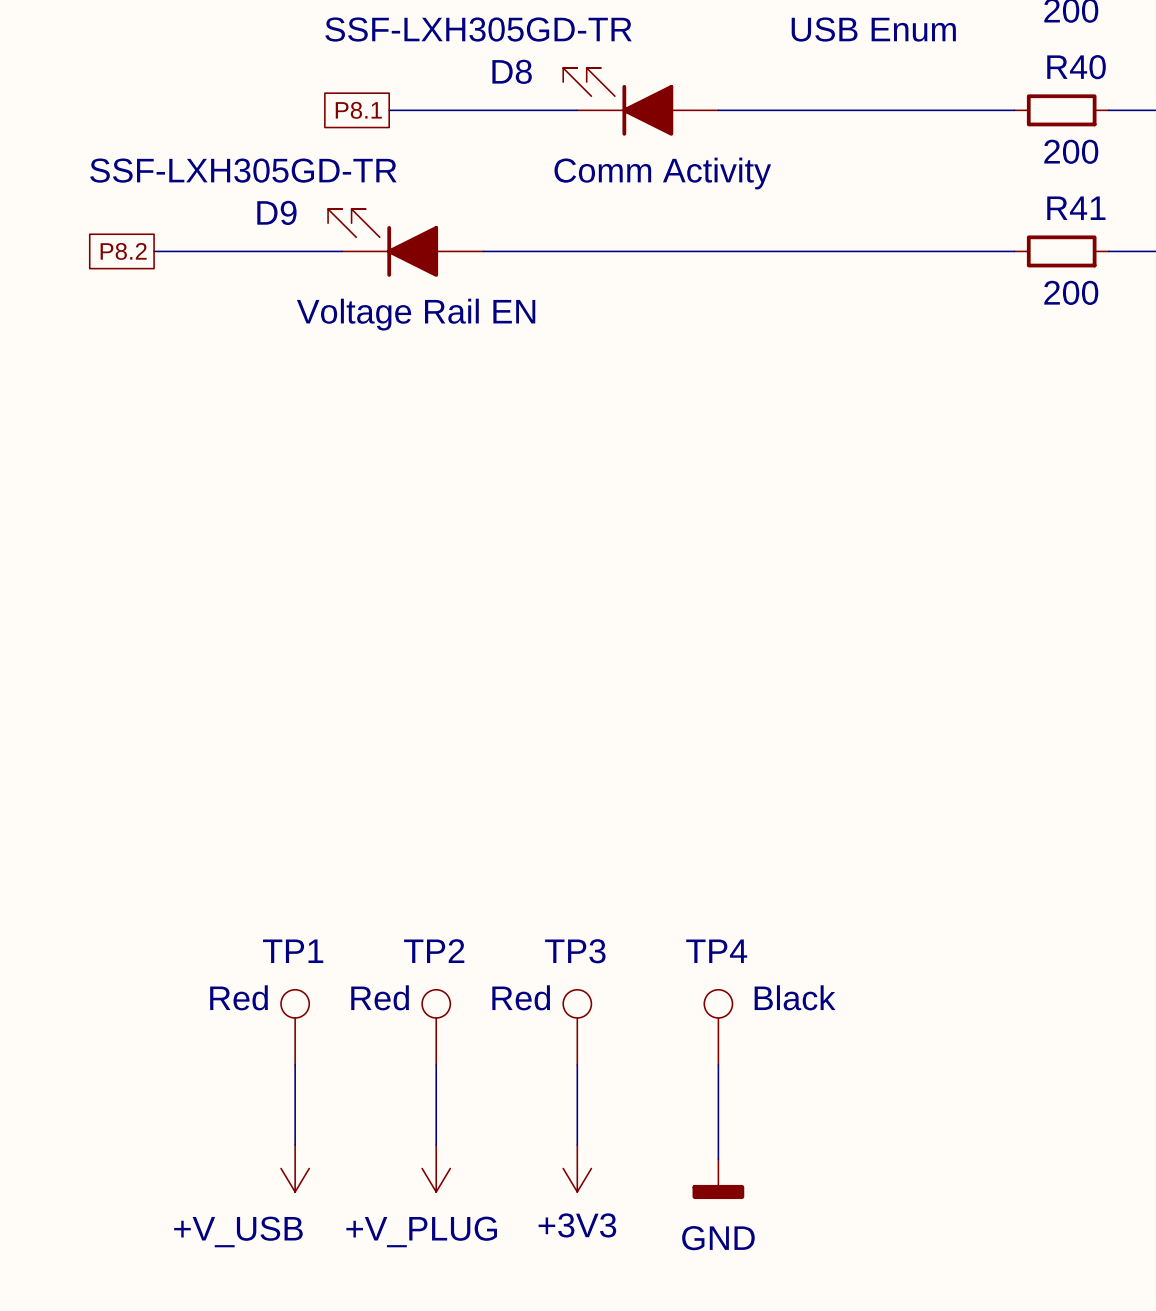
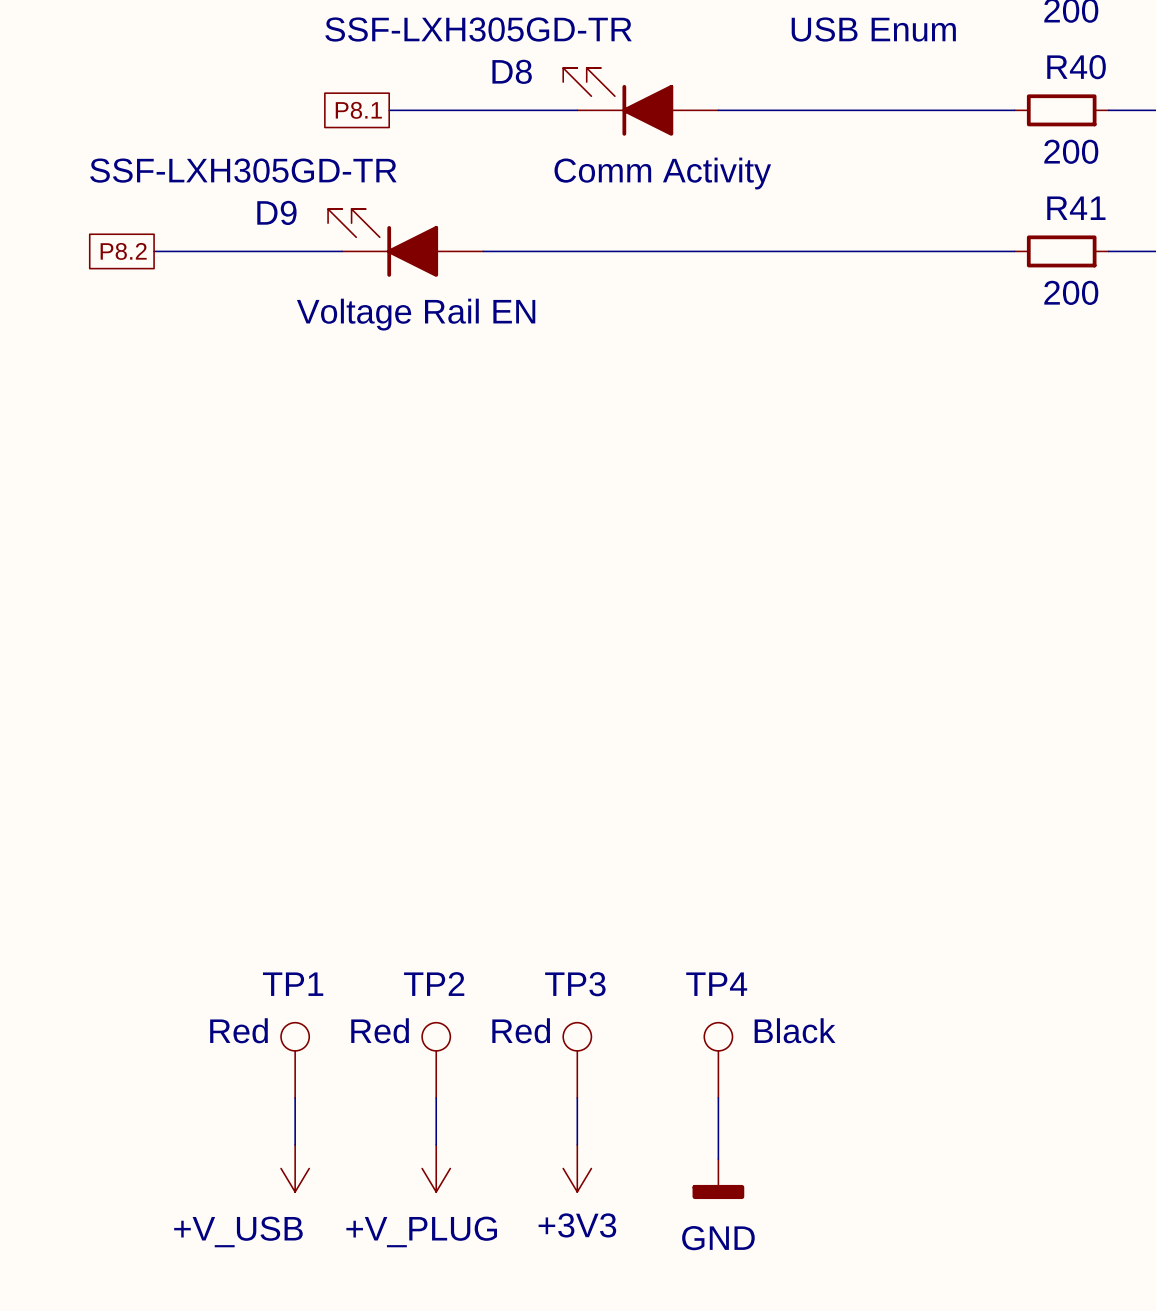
TP1 position: (295, 1027) -> (295, 1060)
TP2 position: (436, 1027) -> (436, 1060)
TP3 position: (577, 1027) -> (577, 1060)
TP4 position: (718, 1027) -> (718, 1060)

